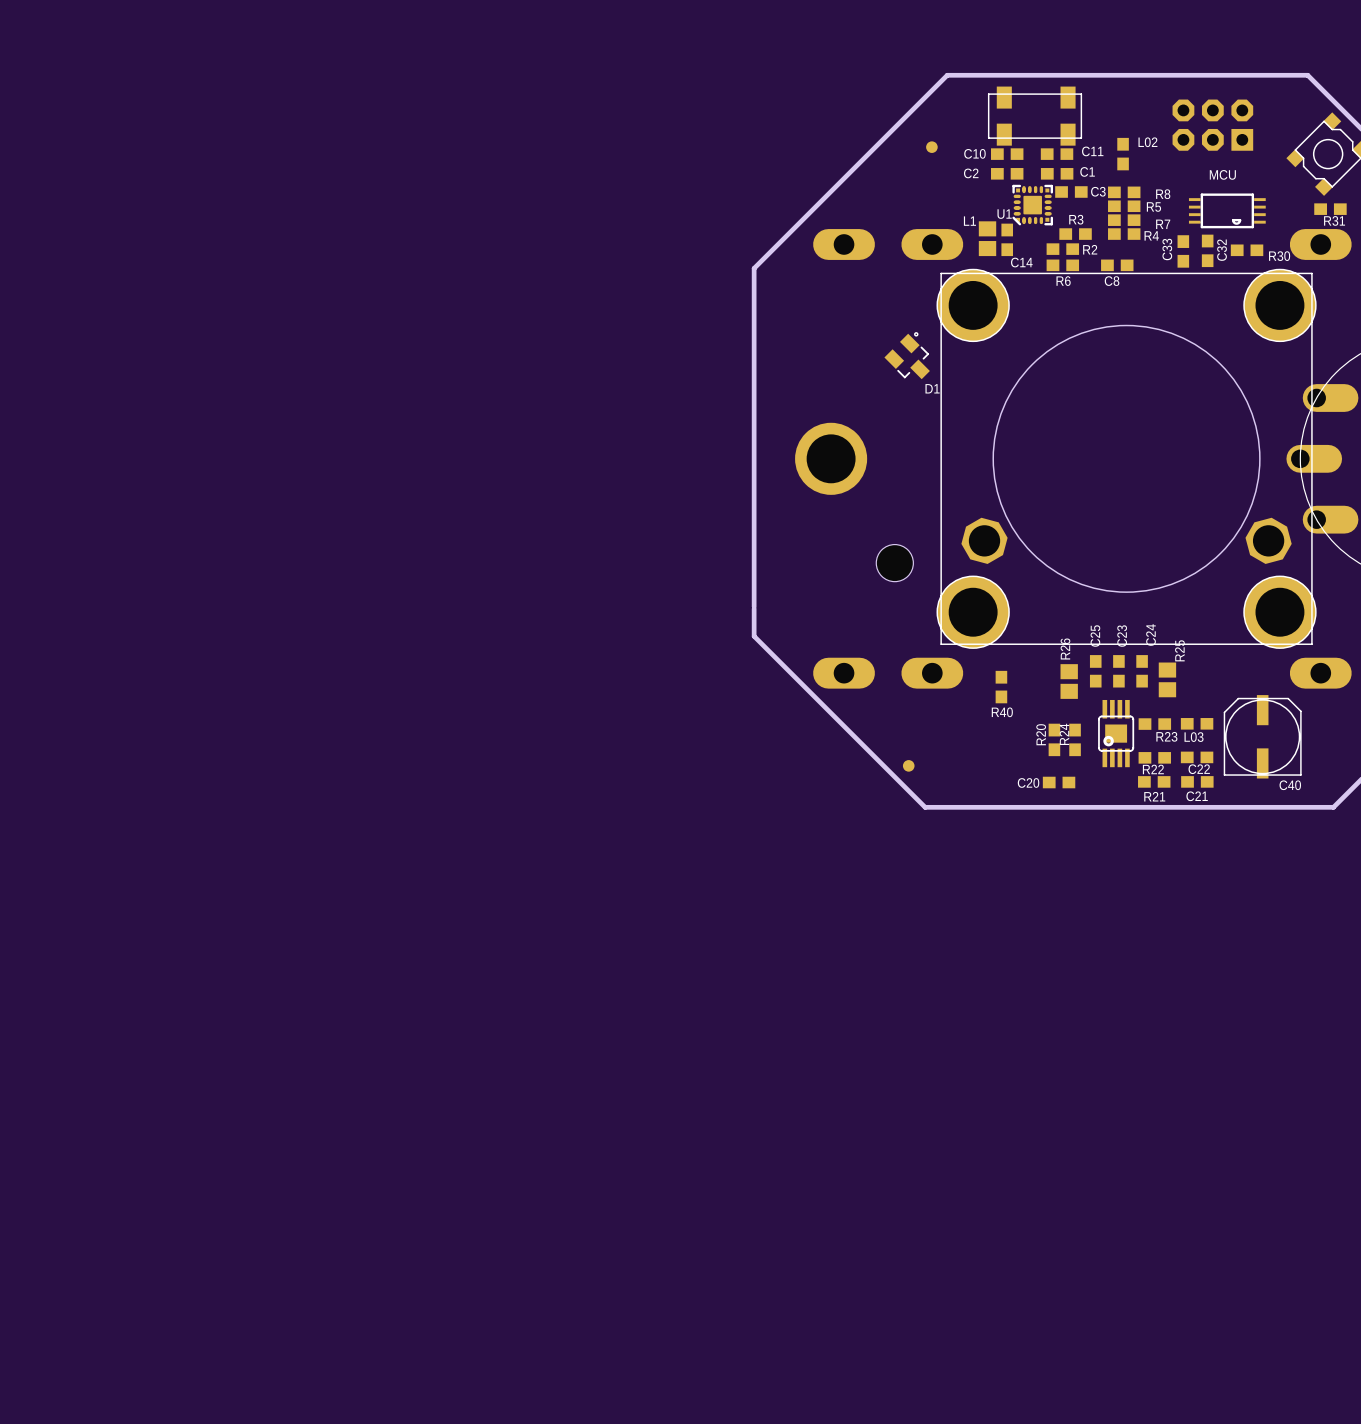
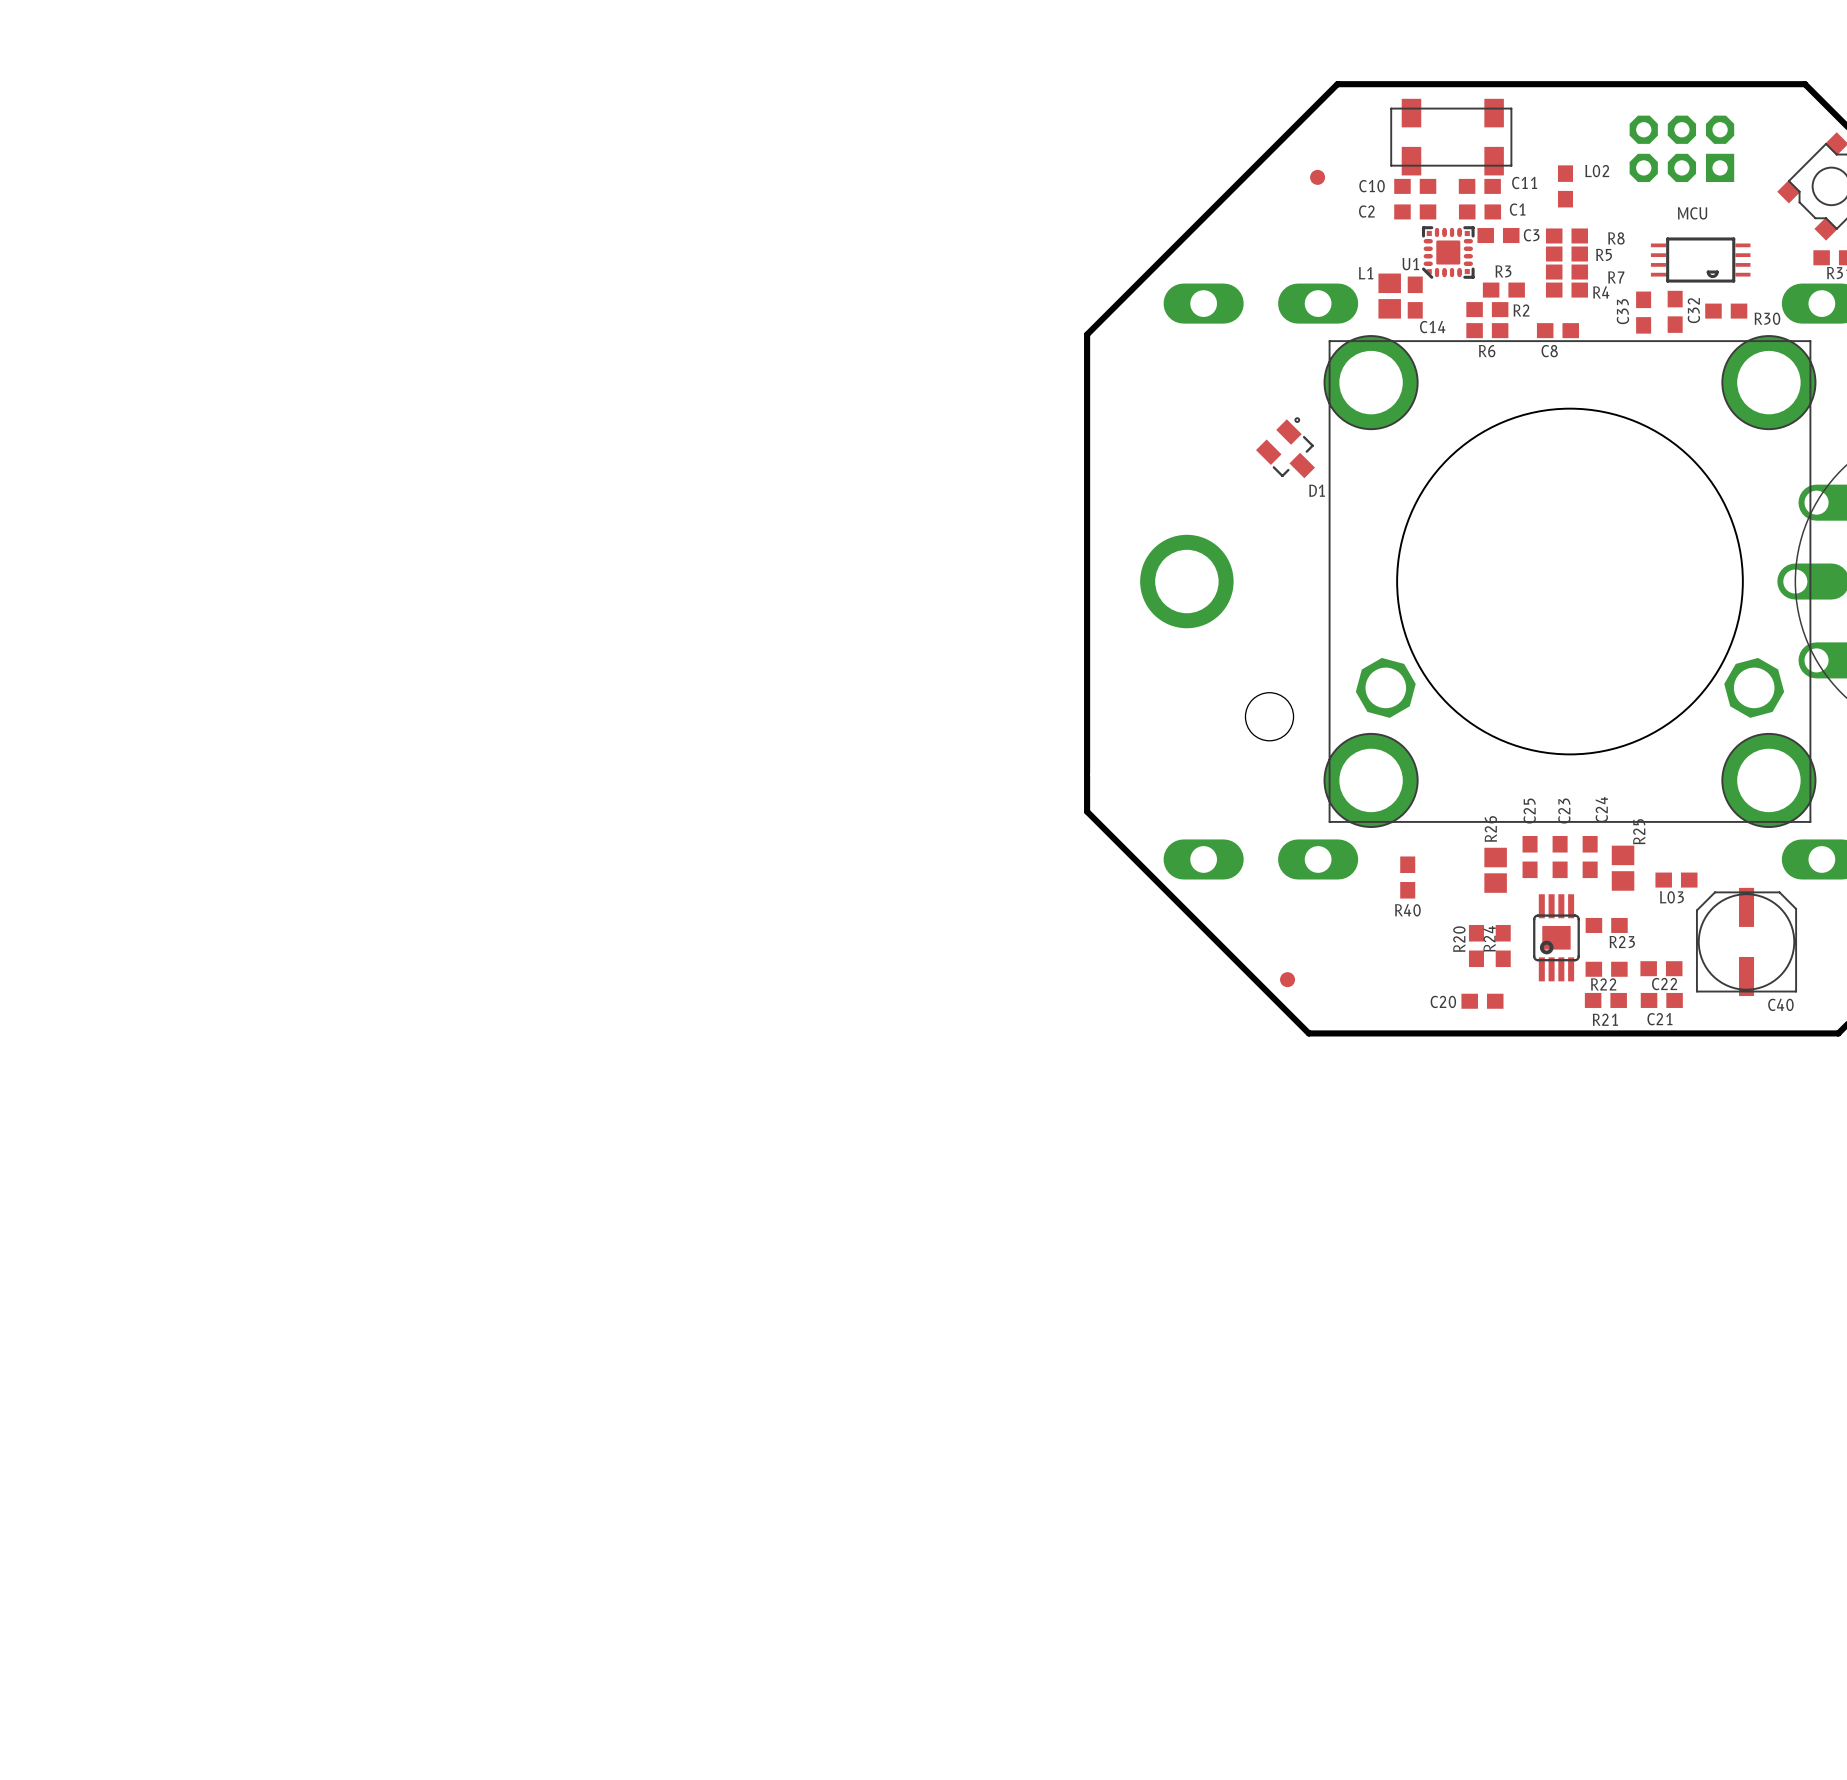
L03 position: (1197, 723) -> (1676, 880)

